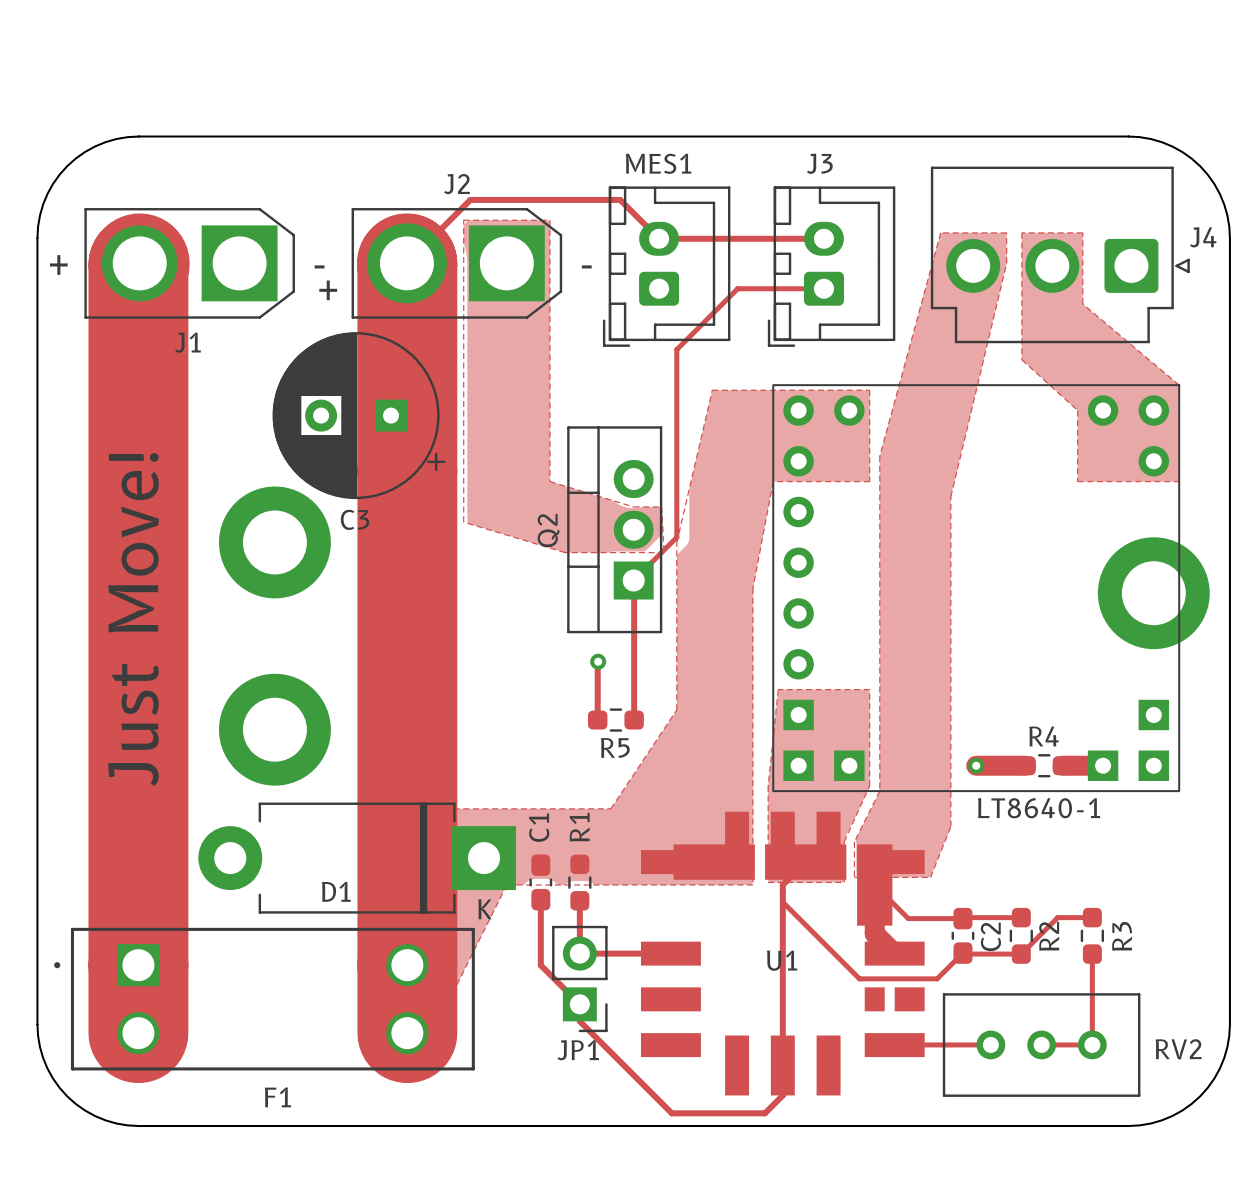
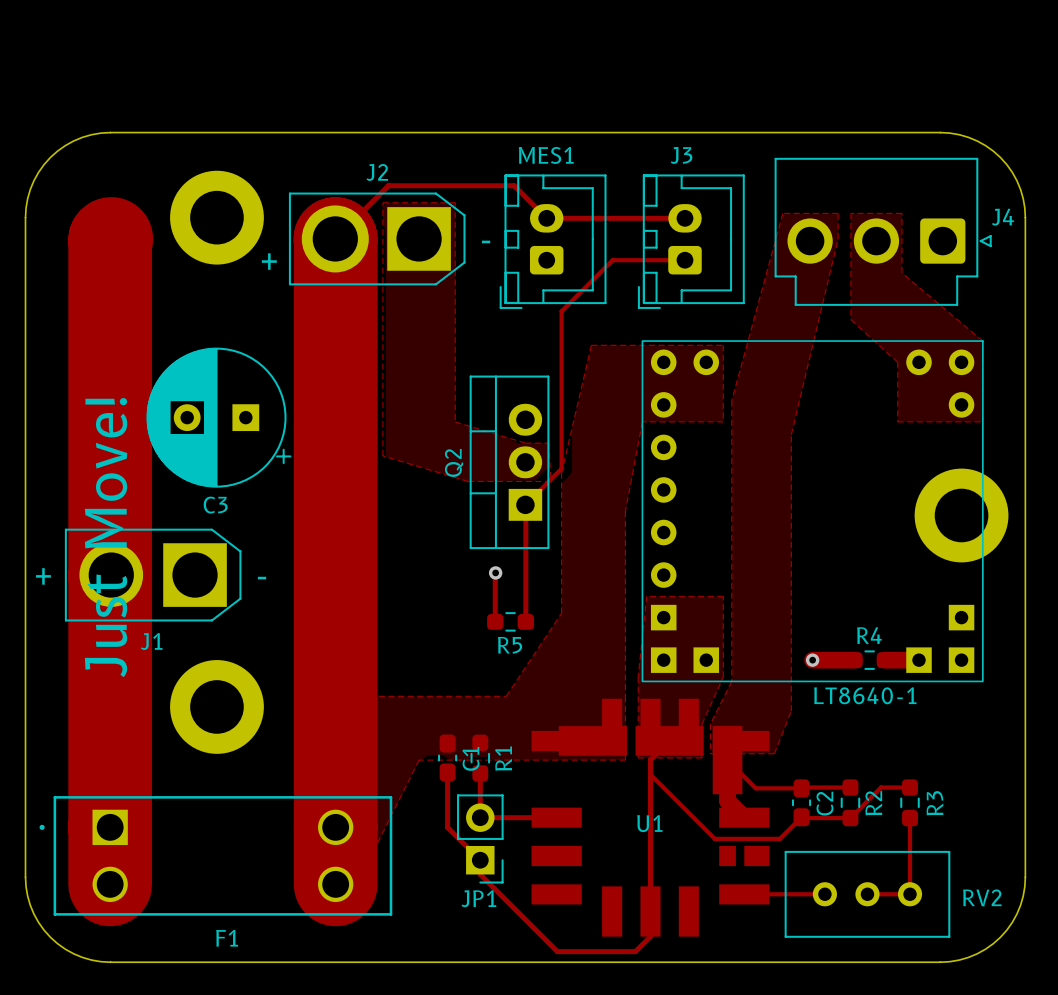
part: none -> (216, 217)
J1 position: (189, 263) -> (153, 575)
C3 position: (358, 415) -> (218, 417)
part: (274, 542) -> none
part position: (274, 729) -> (216, 706)
C1 name position: C1 (539, 827) -> C1 (471, 758)
R1 name position: R1 (579, 827) -> R1 (503, 758)
D1: (357, 858) -> none

